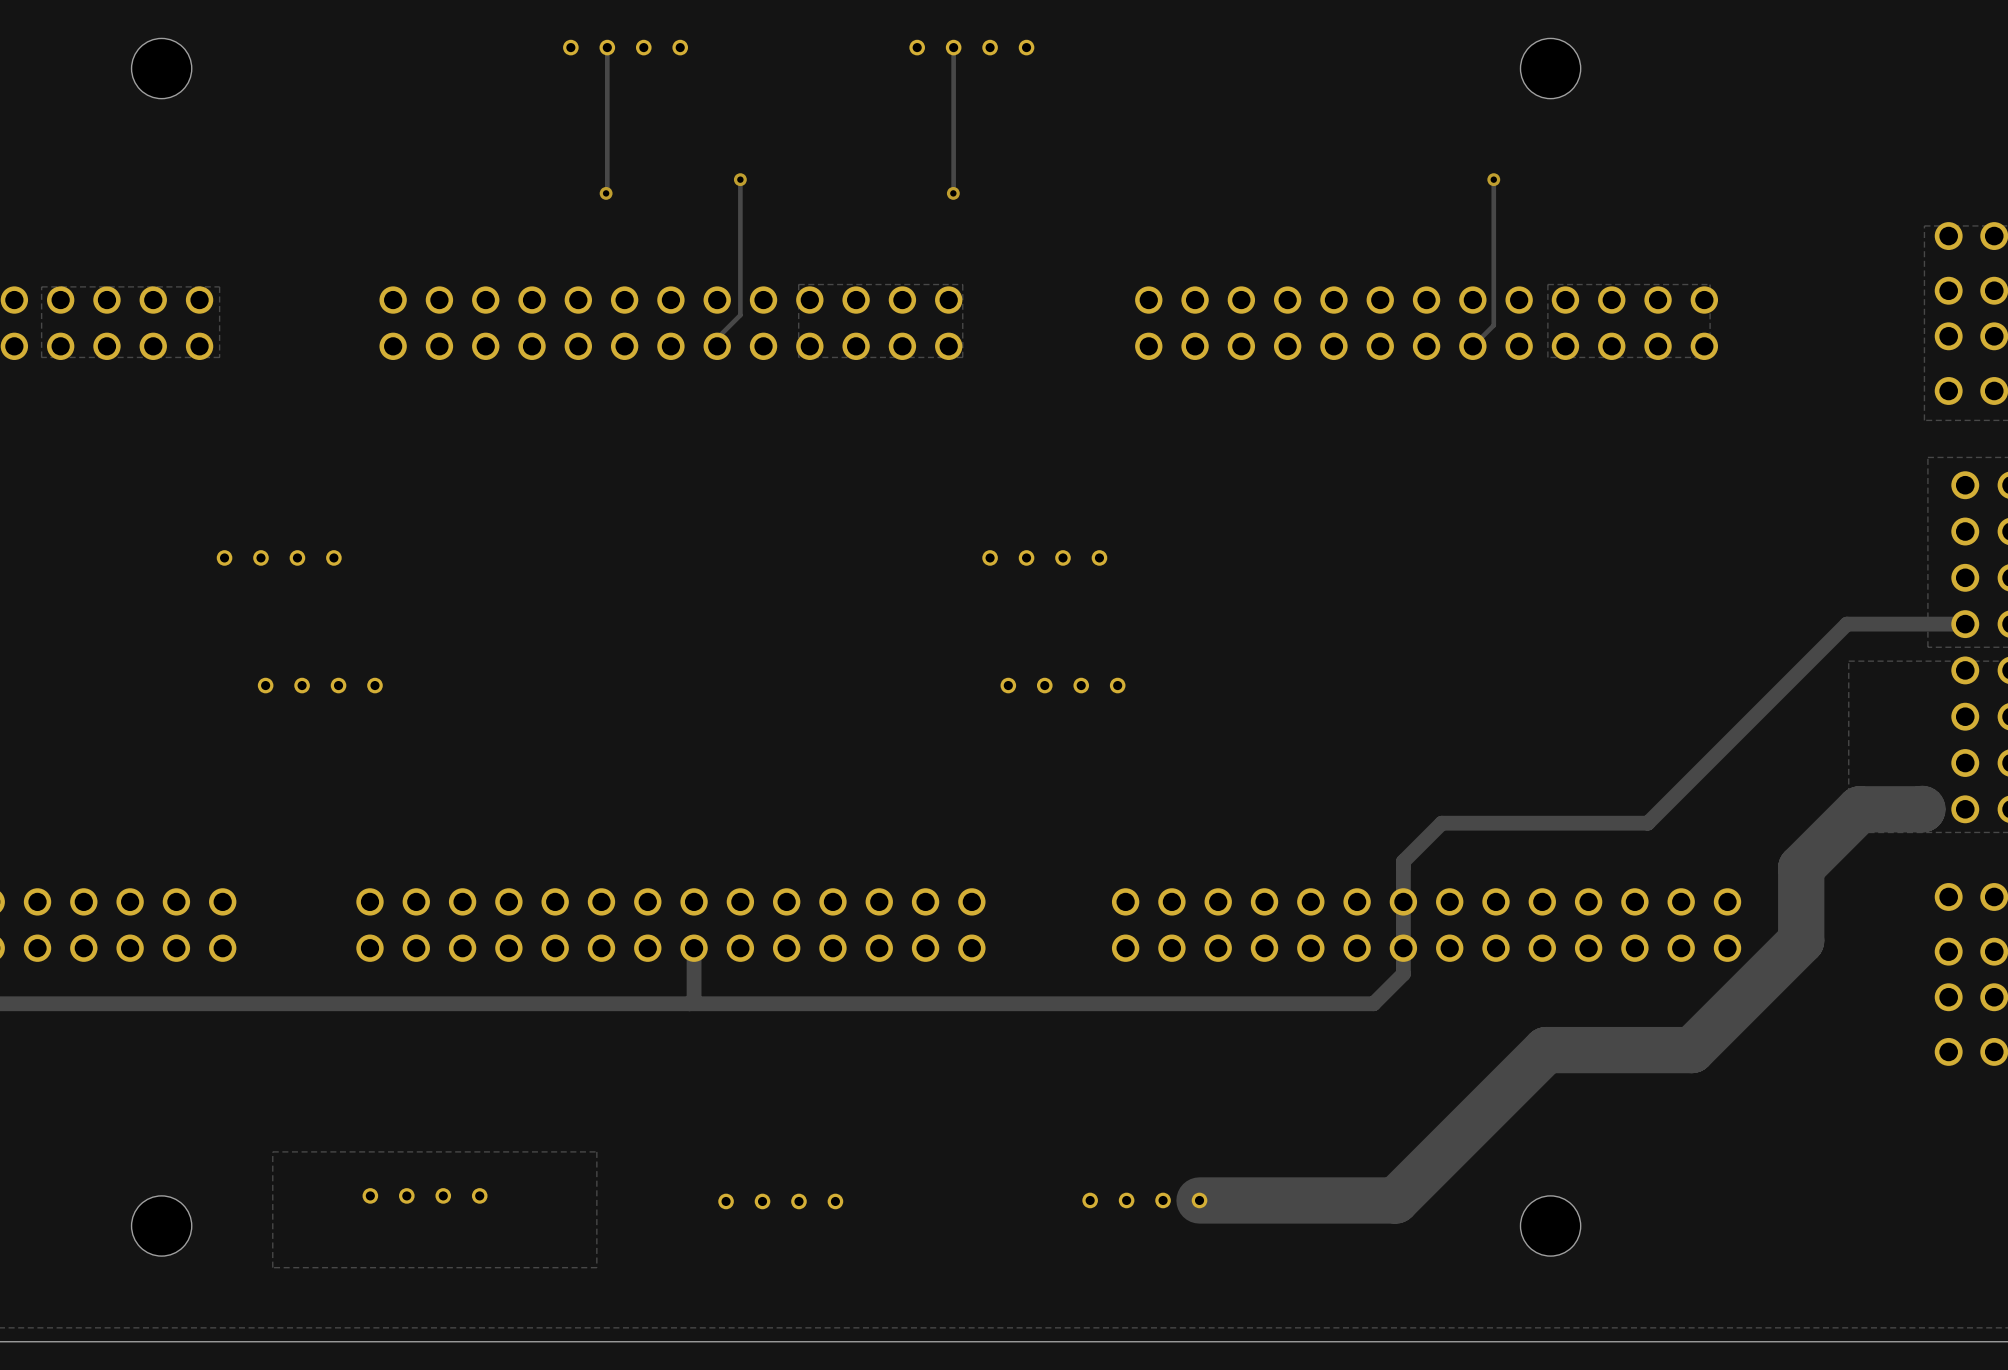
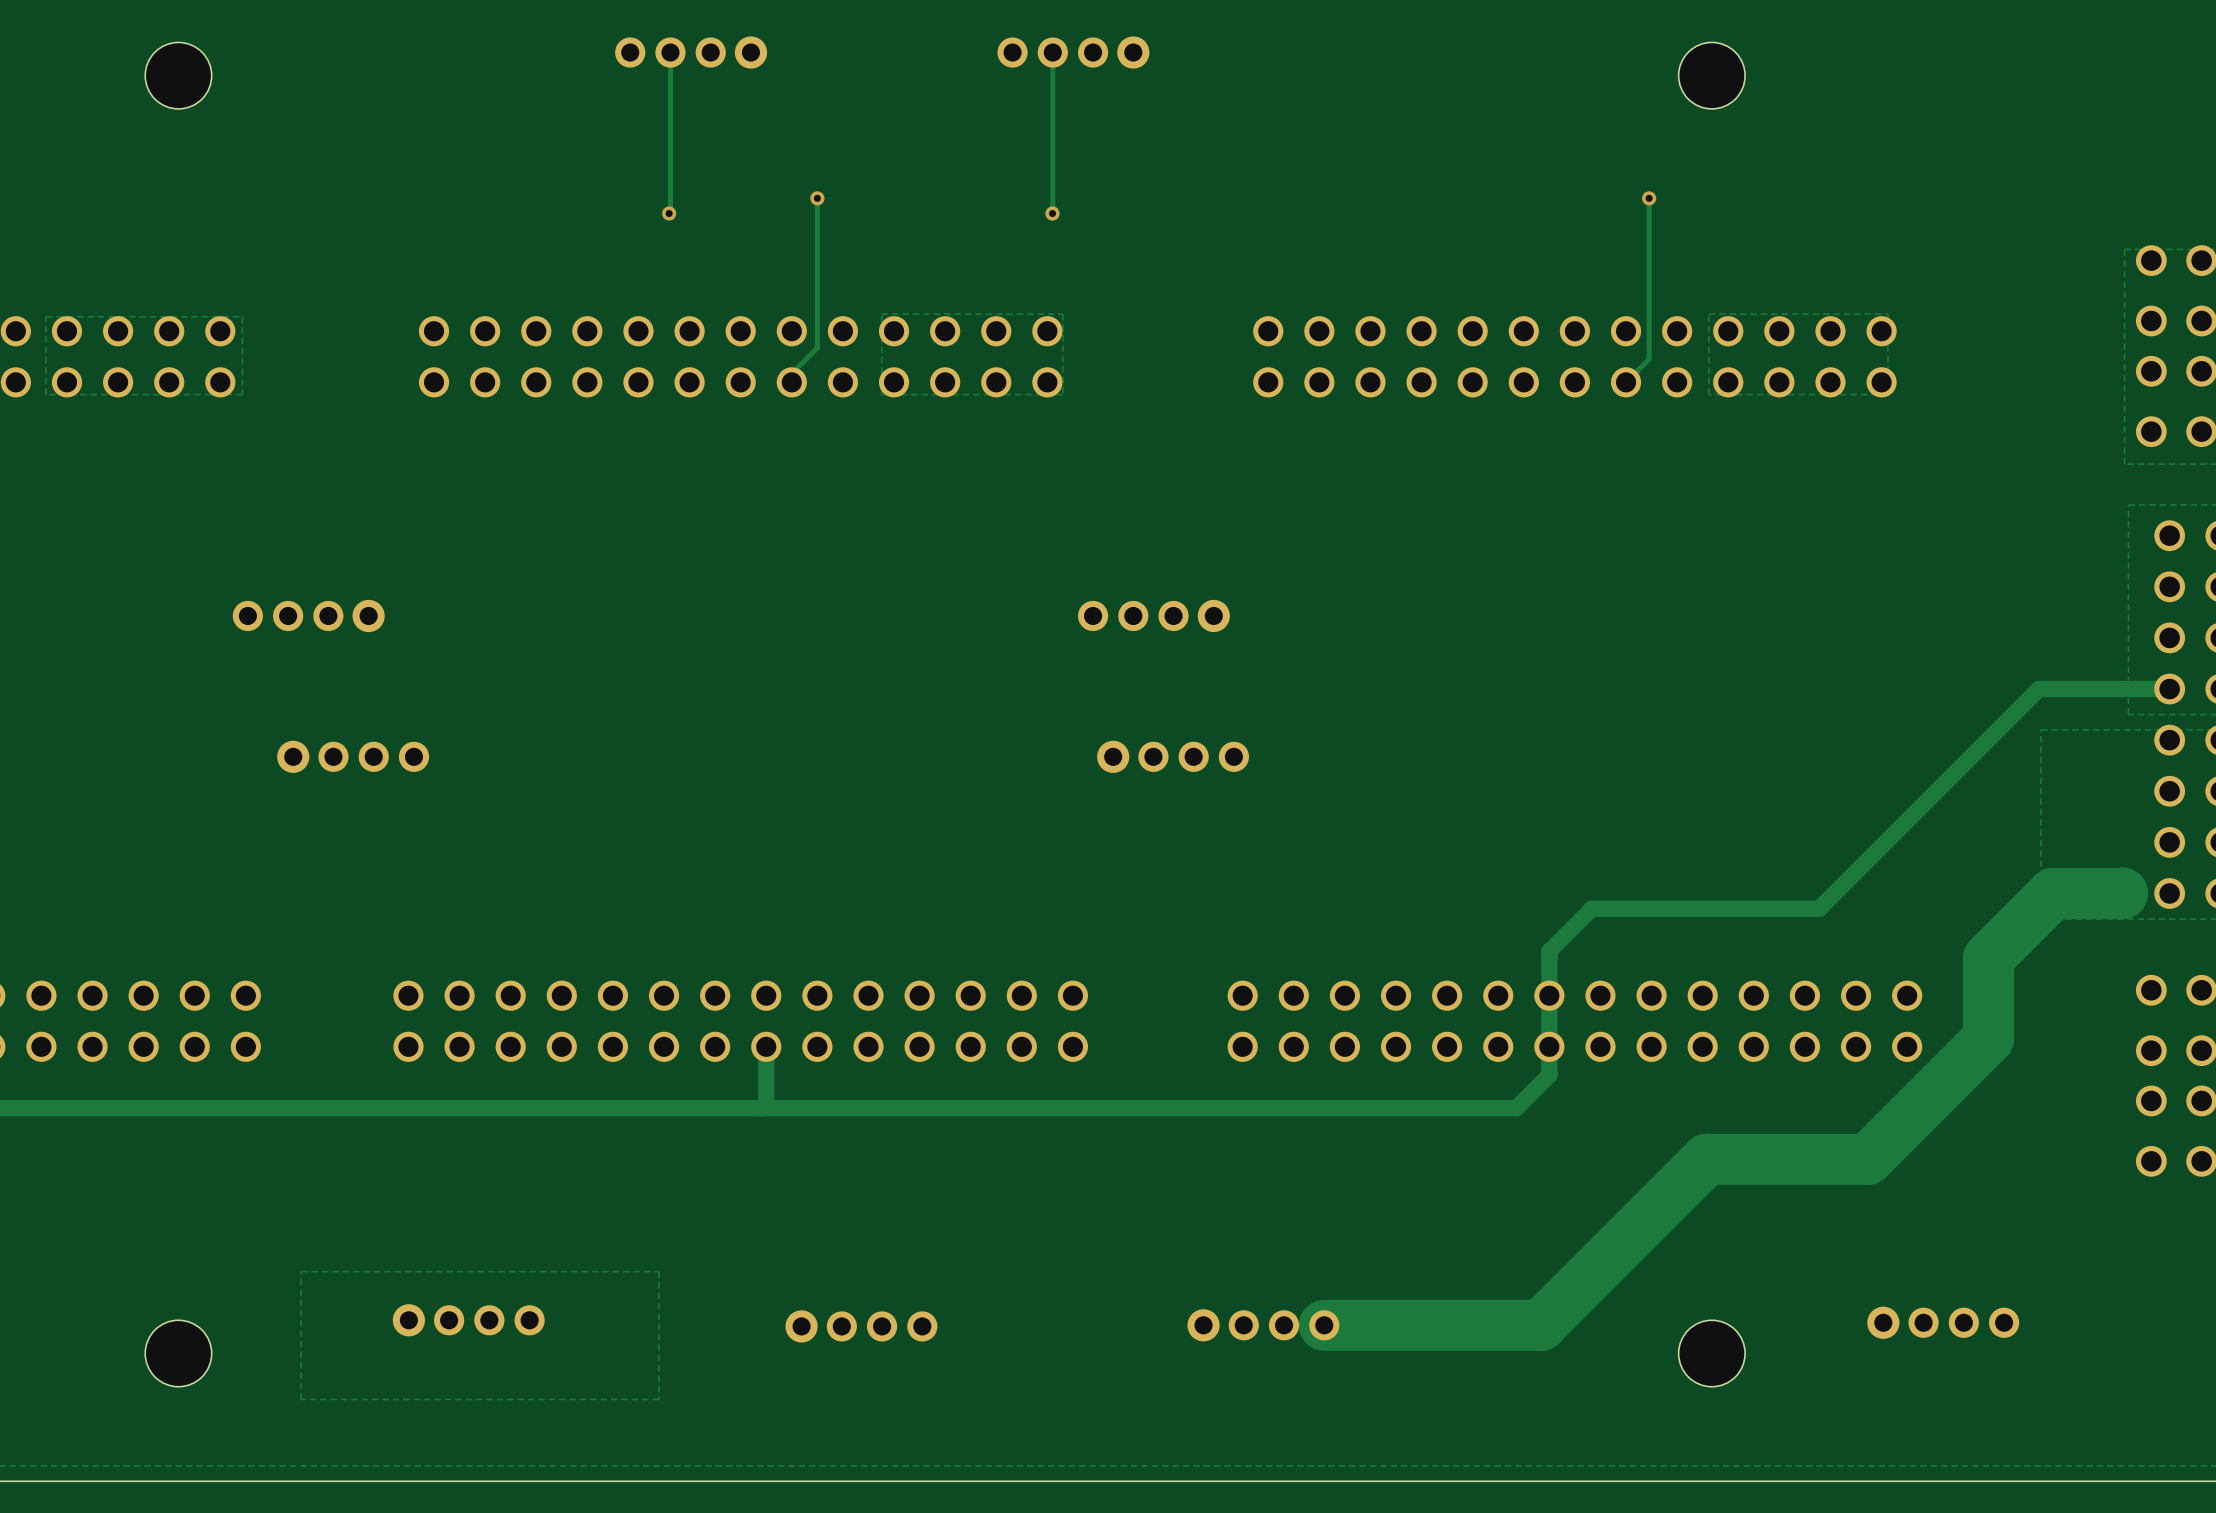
part footprint: [563, 39, 689, 56] -> [615, 36, 768, 69]
part footprint: [909, 39, 1035, 56] -> [997, 36, 1150, 69]
part footprint: [216, 550, 342, 566] -> [232, 599, 385, 633]
part footprint: [982, 550, 1108, 566] -> [1077, 599, 1230, 633]
part footprint: [257, 677, 383, 694] -> [277, 740, 430, 773]
part footprint: [1000, 677, 1126, 694] -> [1097, 740, 1250, 773]
part footprint: [362, 1188, 488, 1204] -> [392, 1304, 545, 1337]
part footprint: [1082, 1192, 1208, 1209] -> [1187, 1309, 1340, 1342]
part footprint: [718, 1193, 844, 1210] -> [785, 1310, 938, 1343]
part: none -> (1943, 1322)

